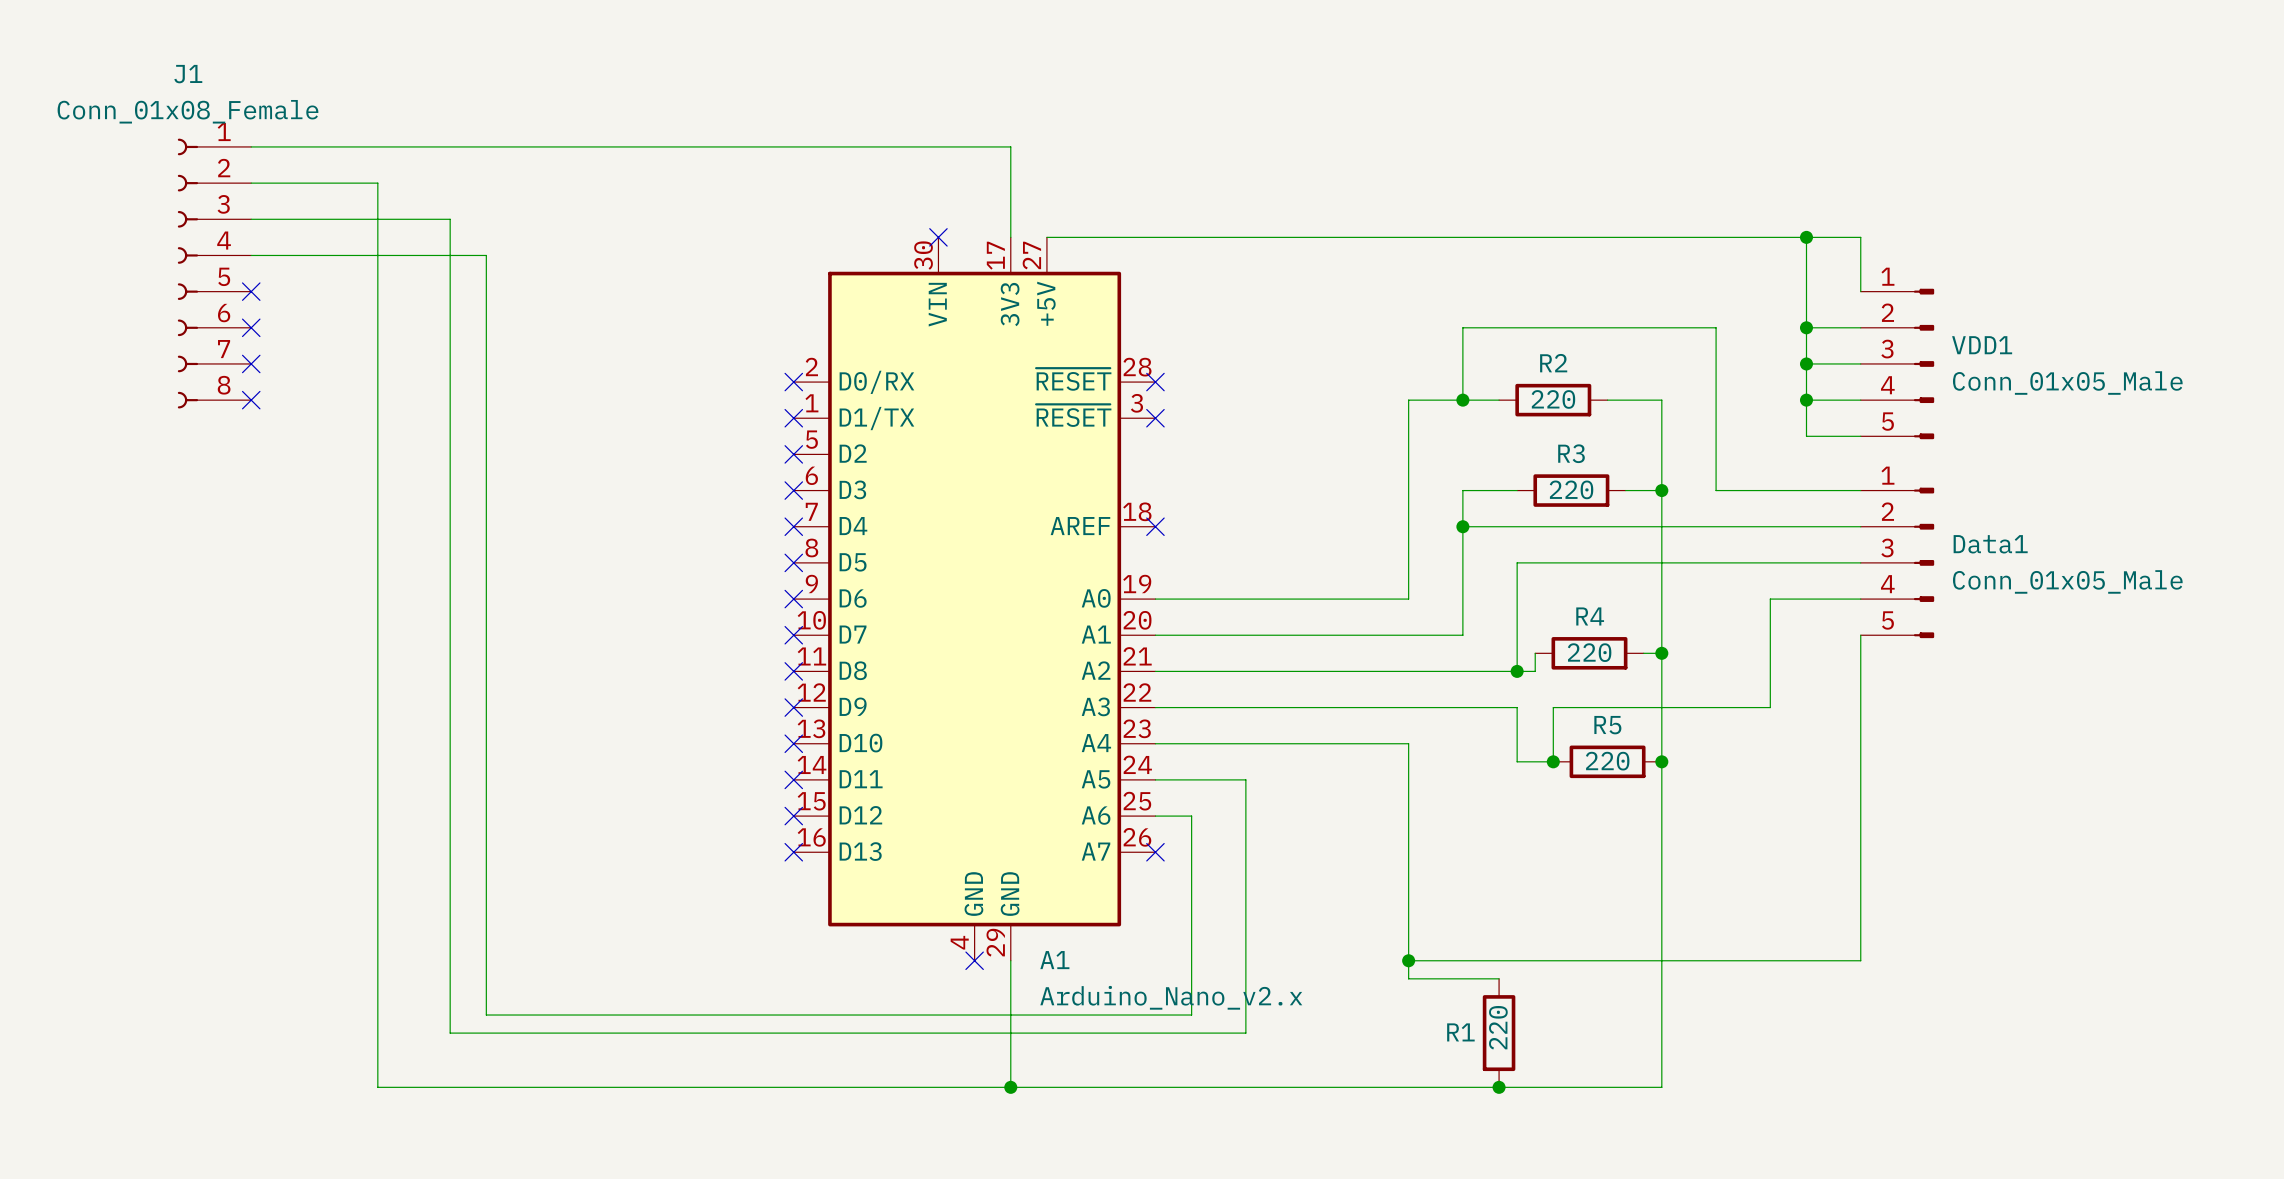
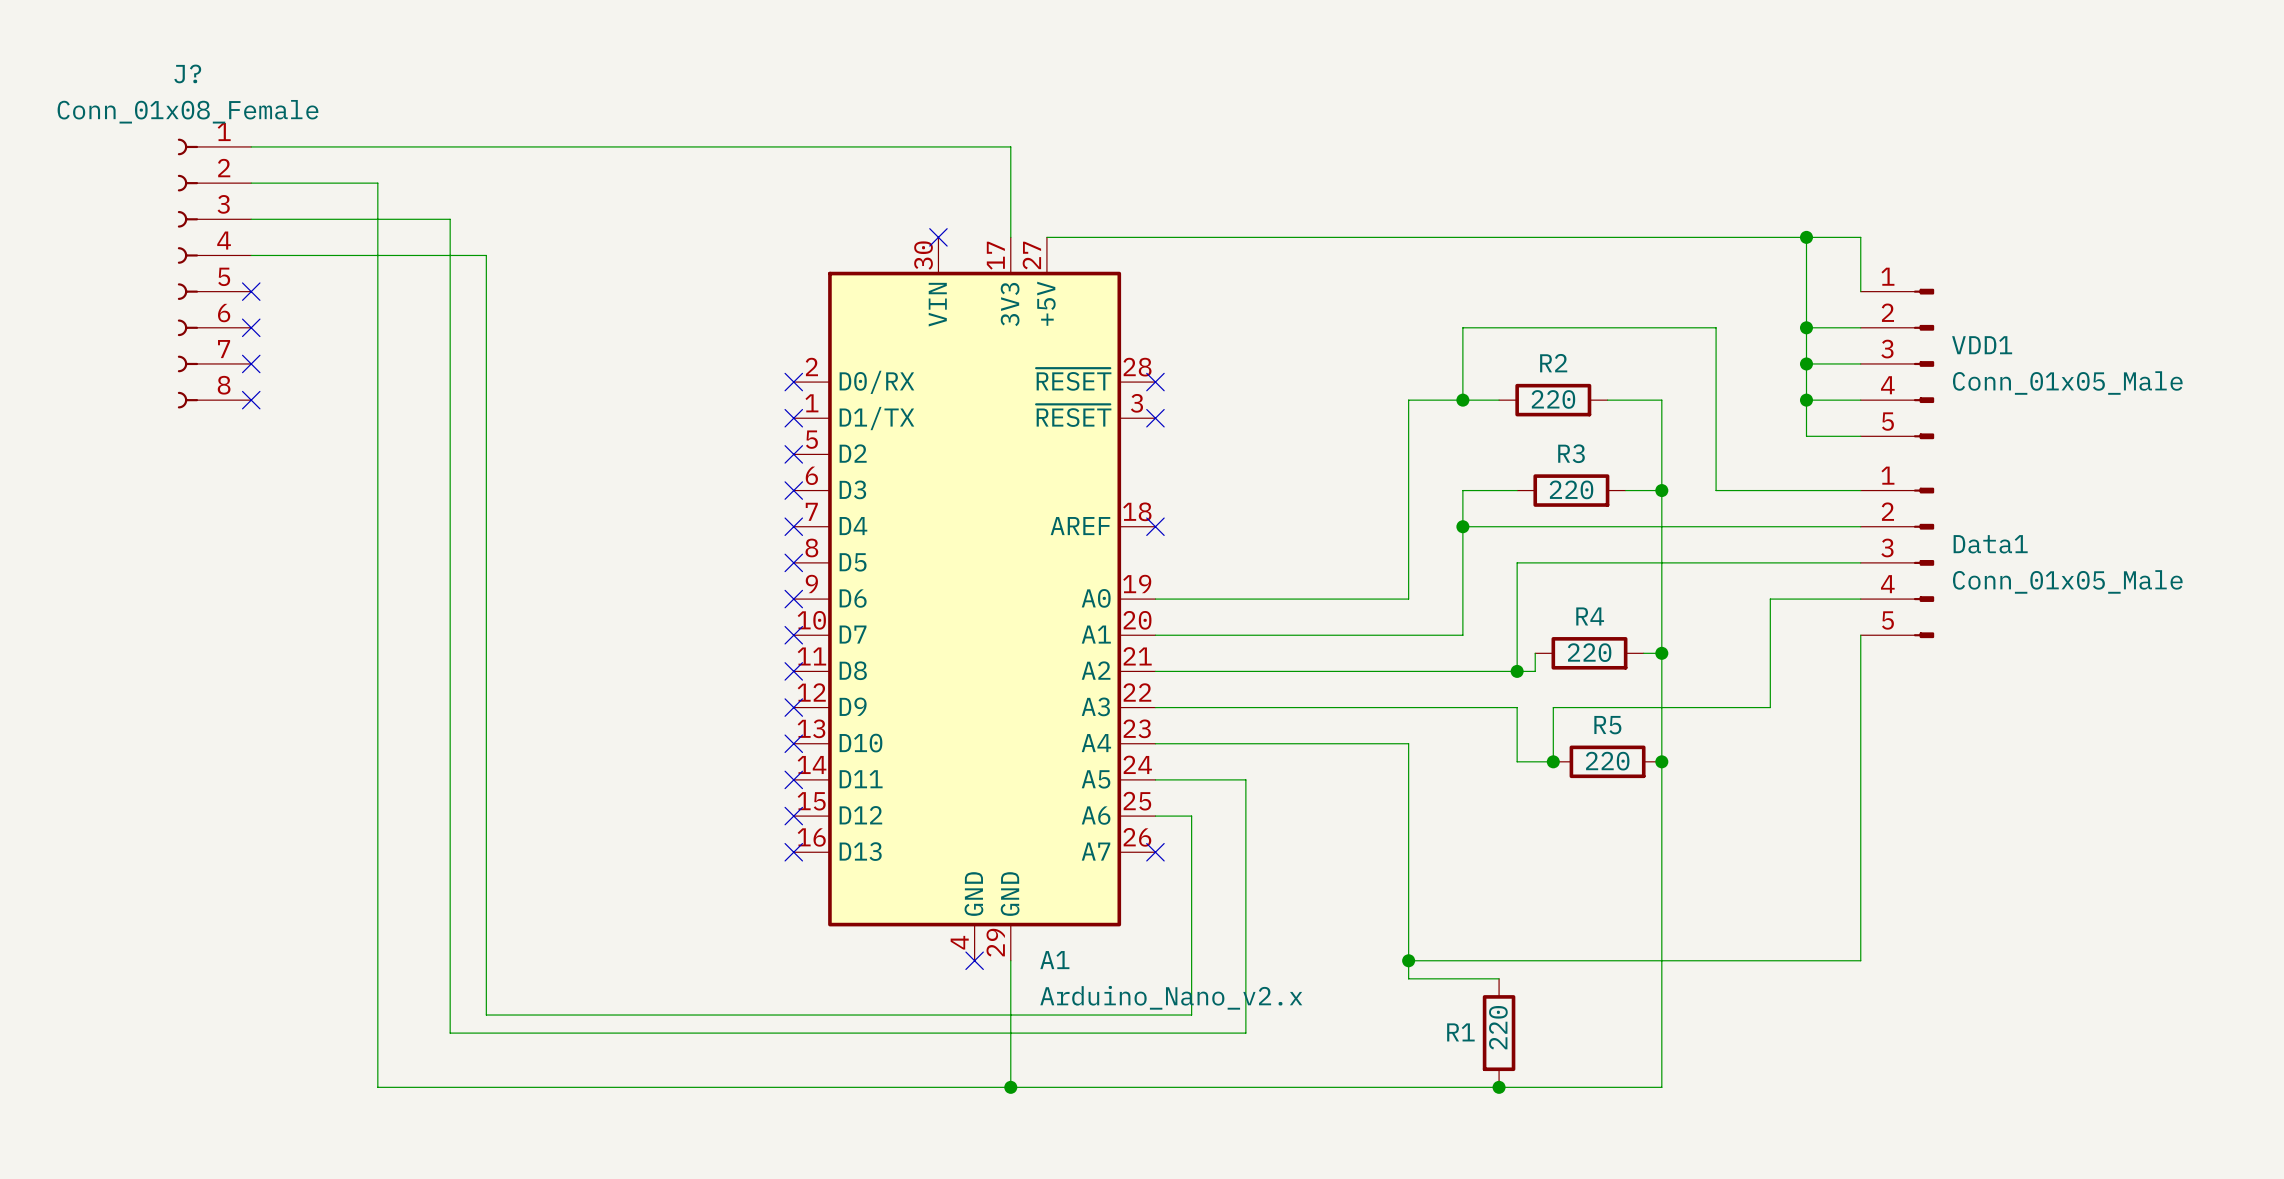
J1 name: J1 (188, 74) -> J? (187, 73)

